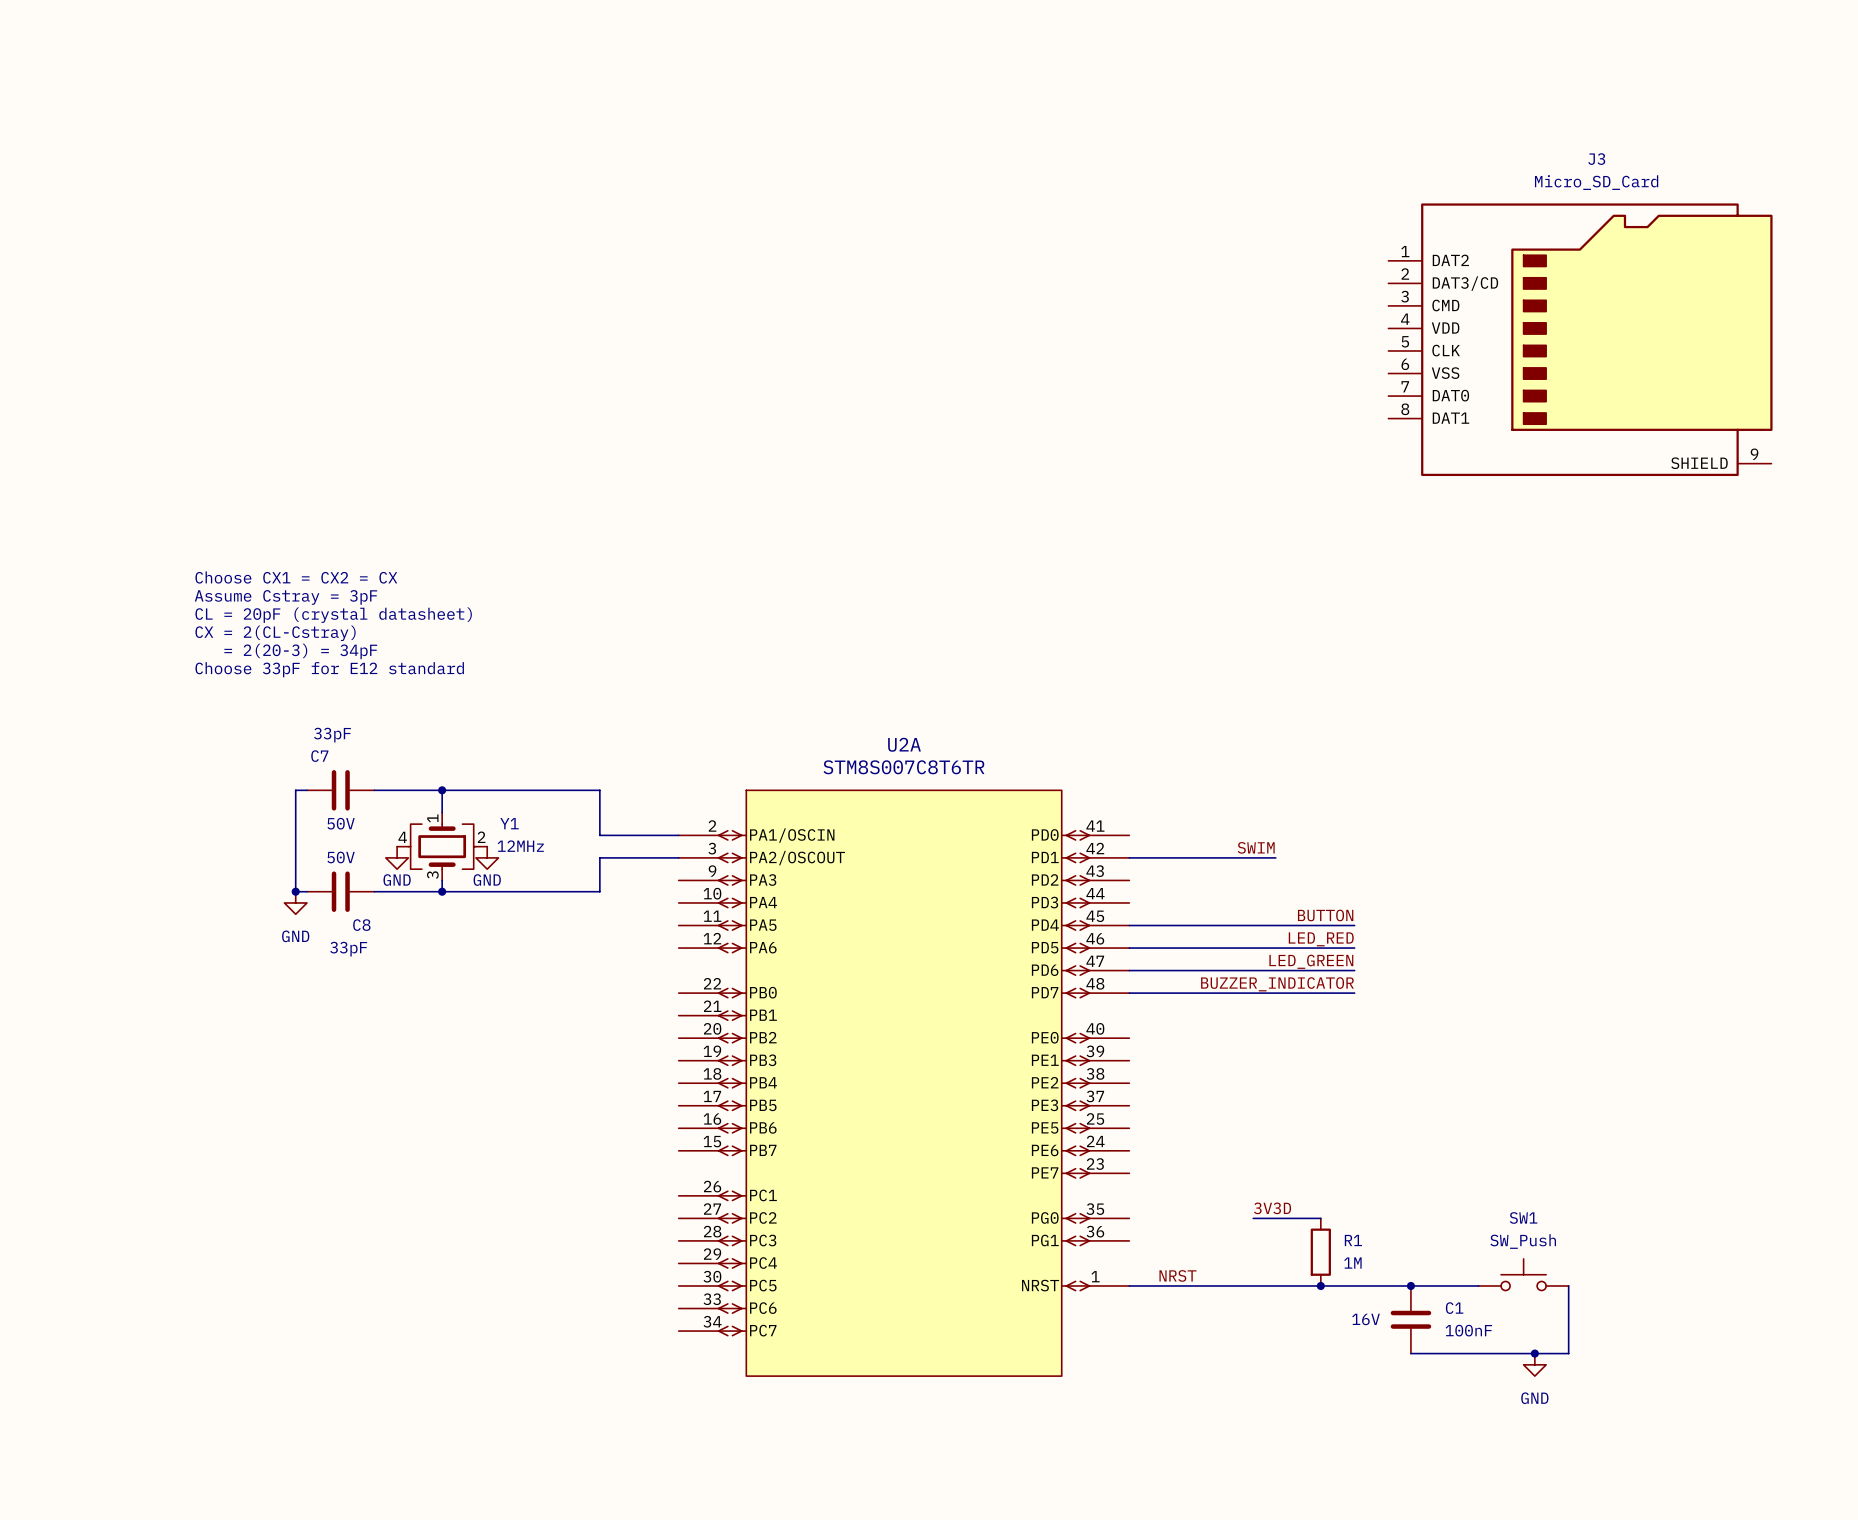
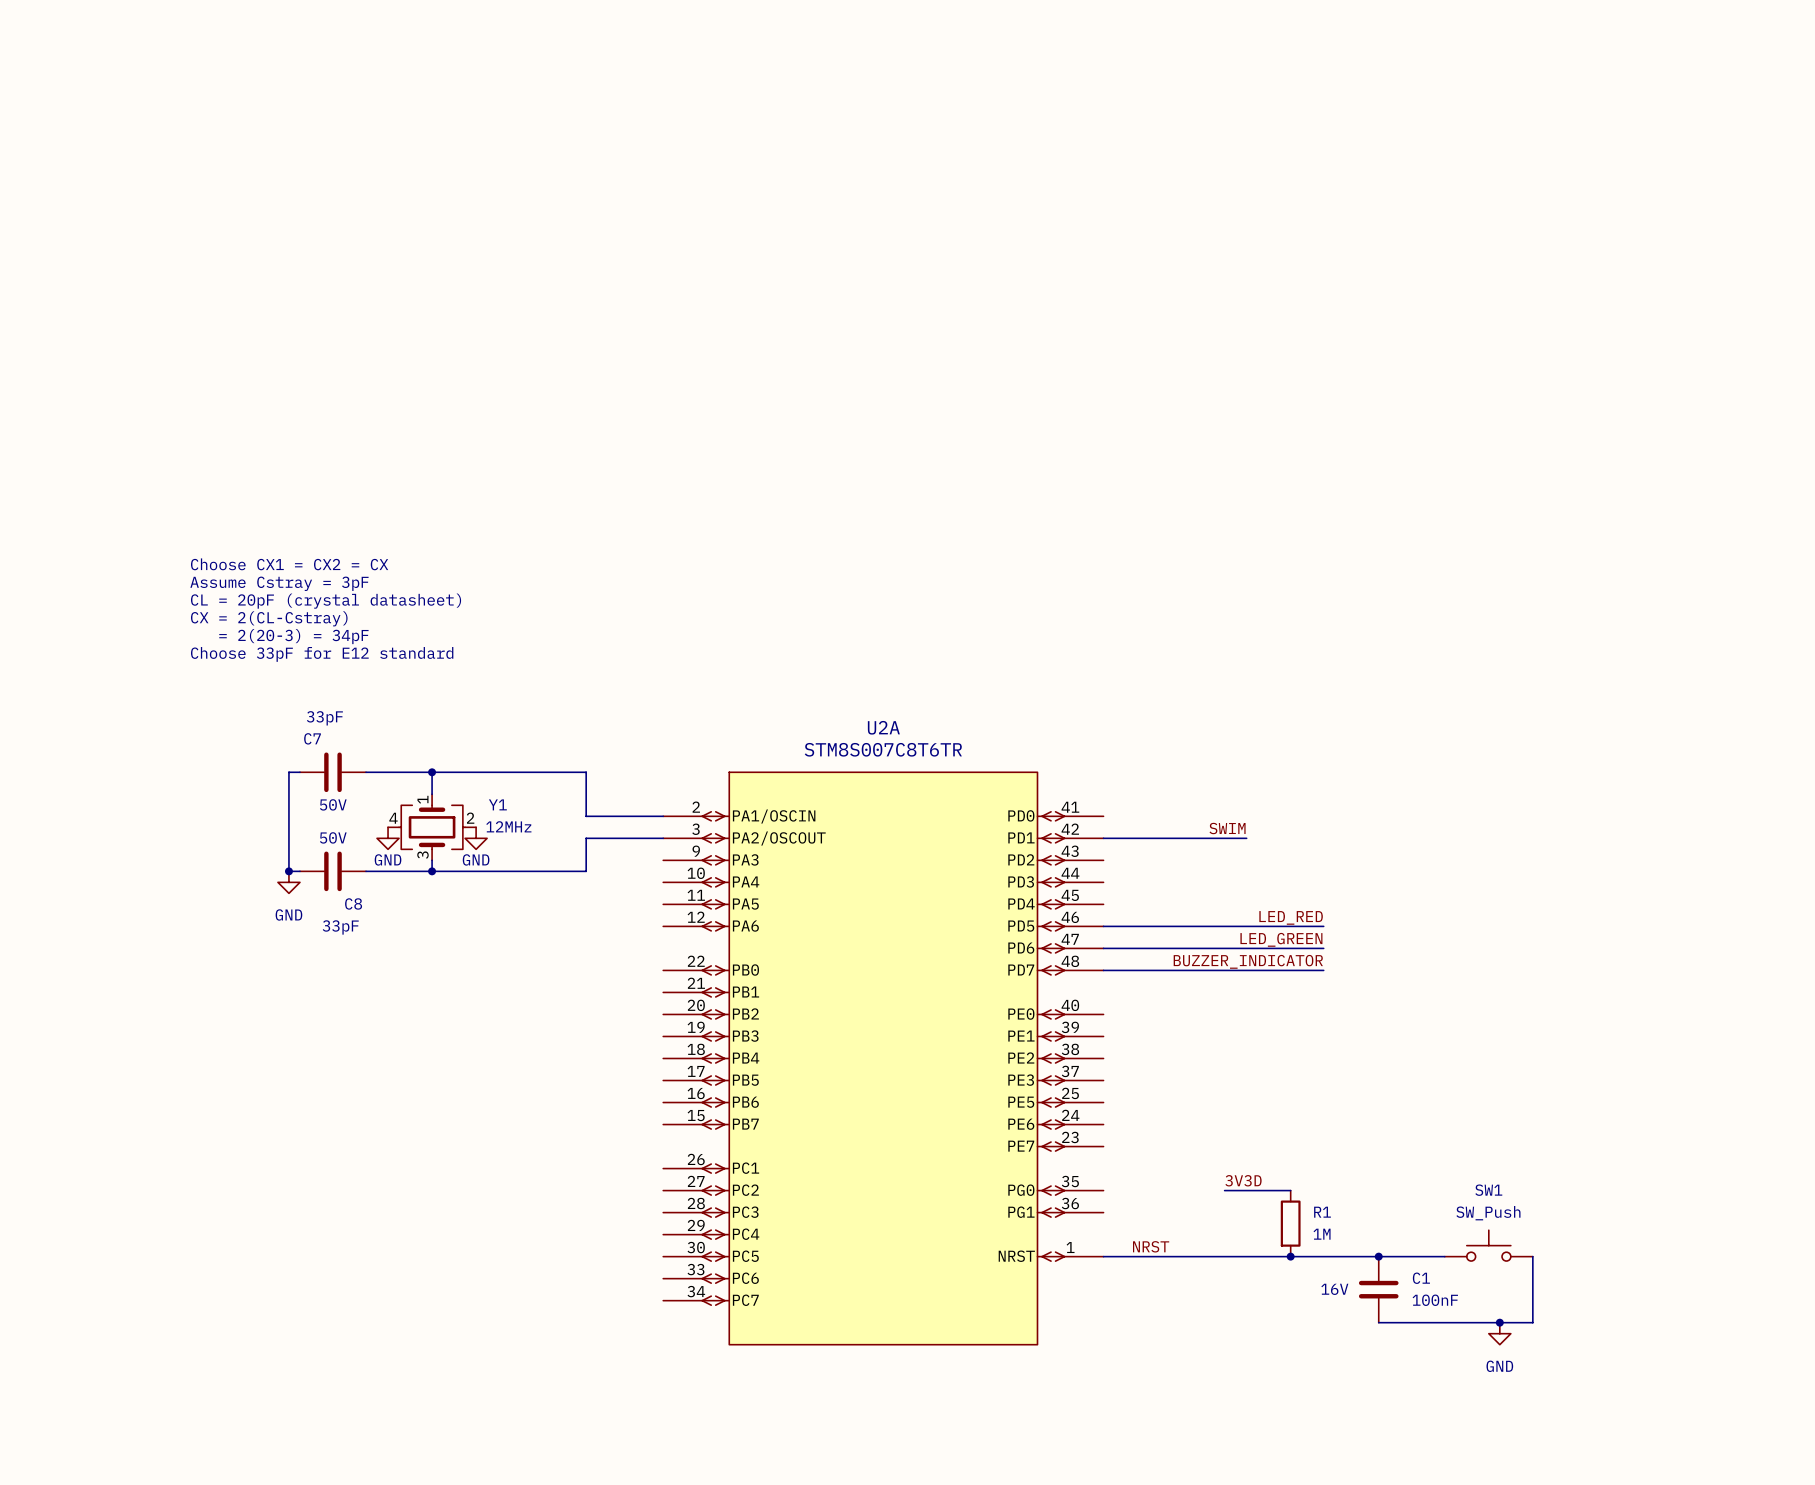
J3: Micro_SD_Card (1580, 339) -> none
label: BUTTON (1325, 915) -> none
wire: (1129, 925) (1354, 925) -> none

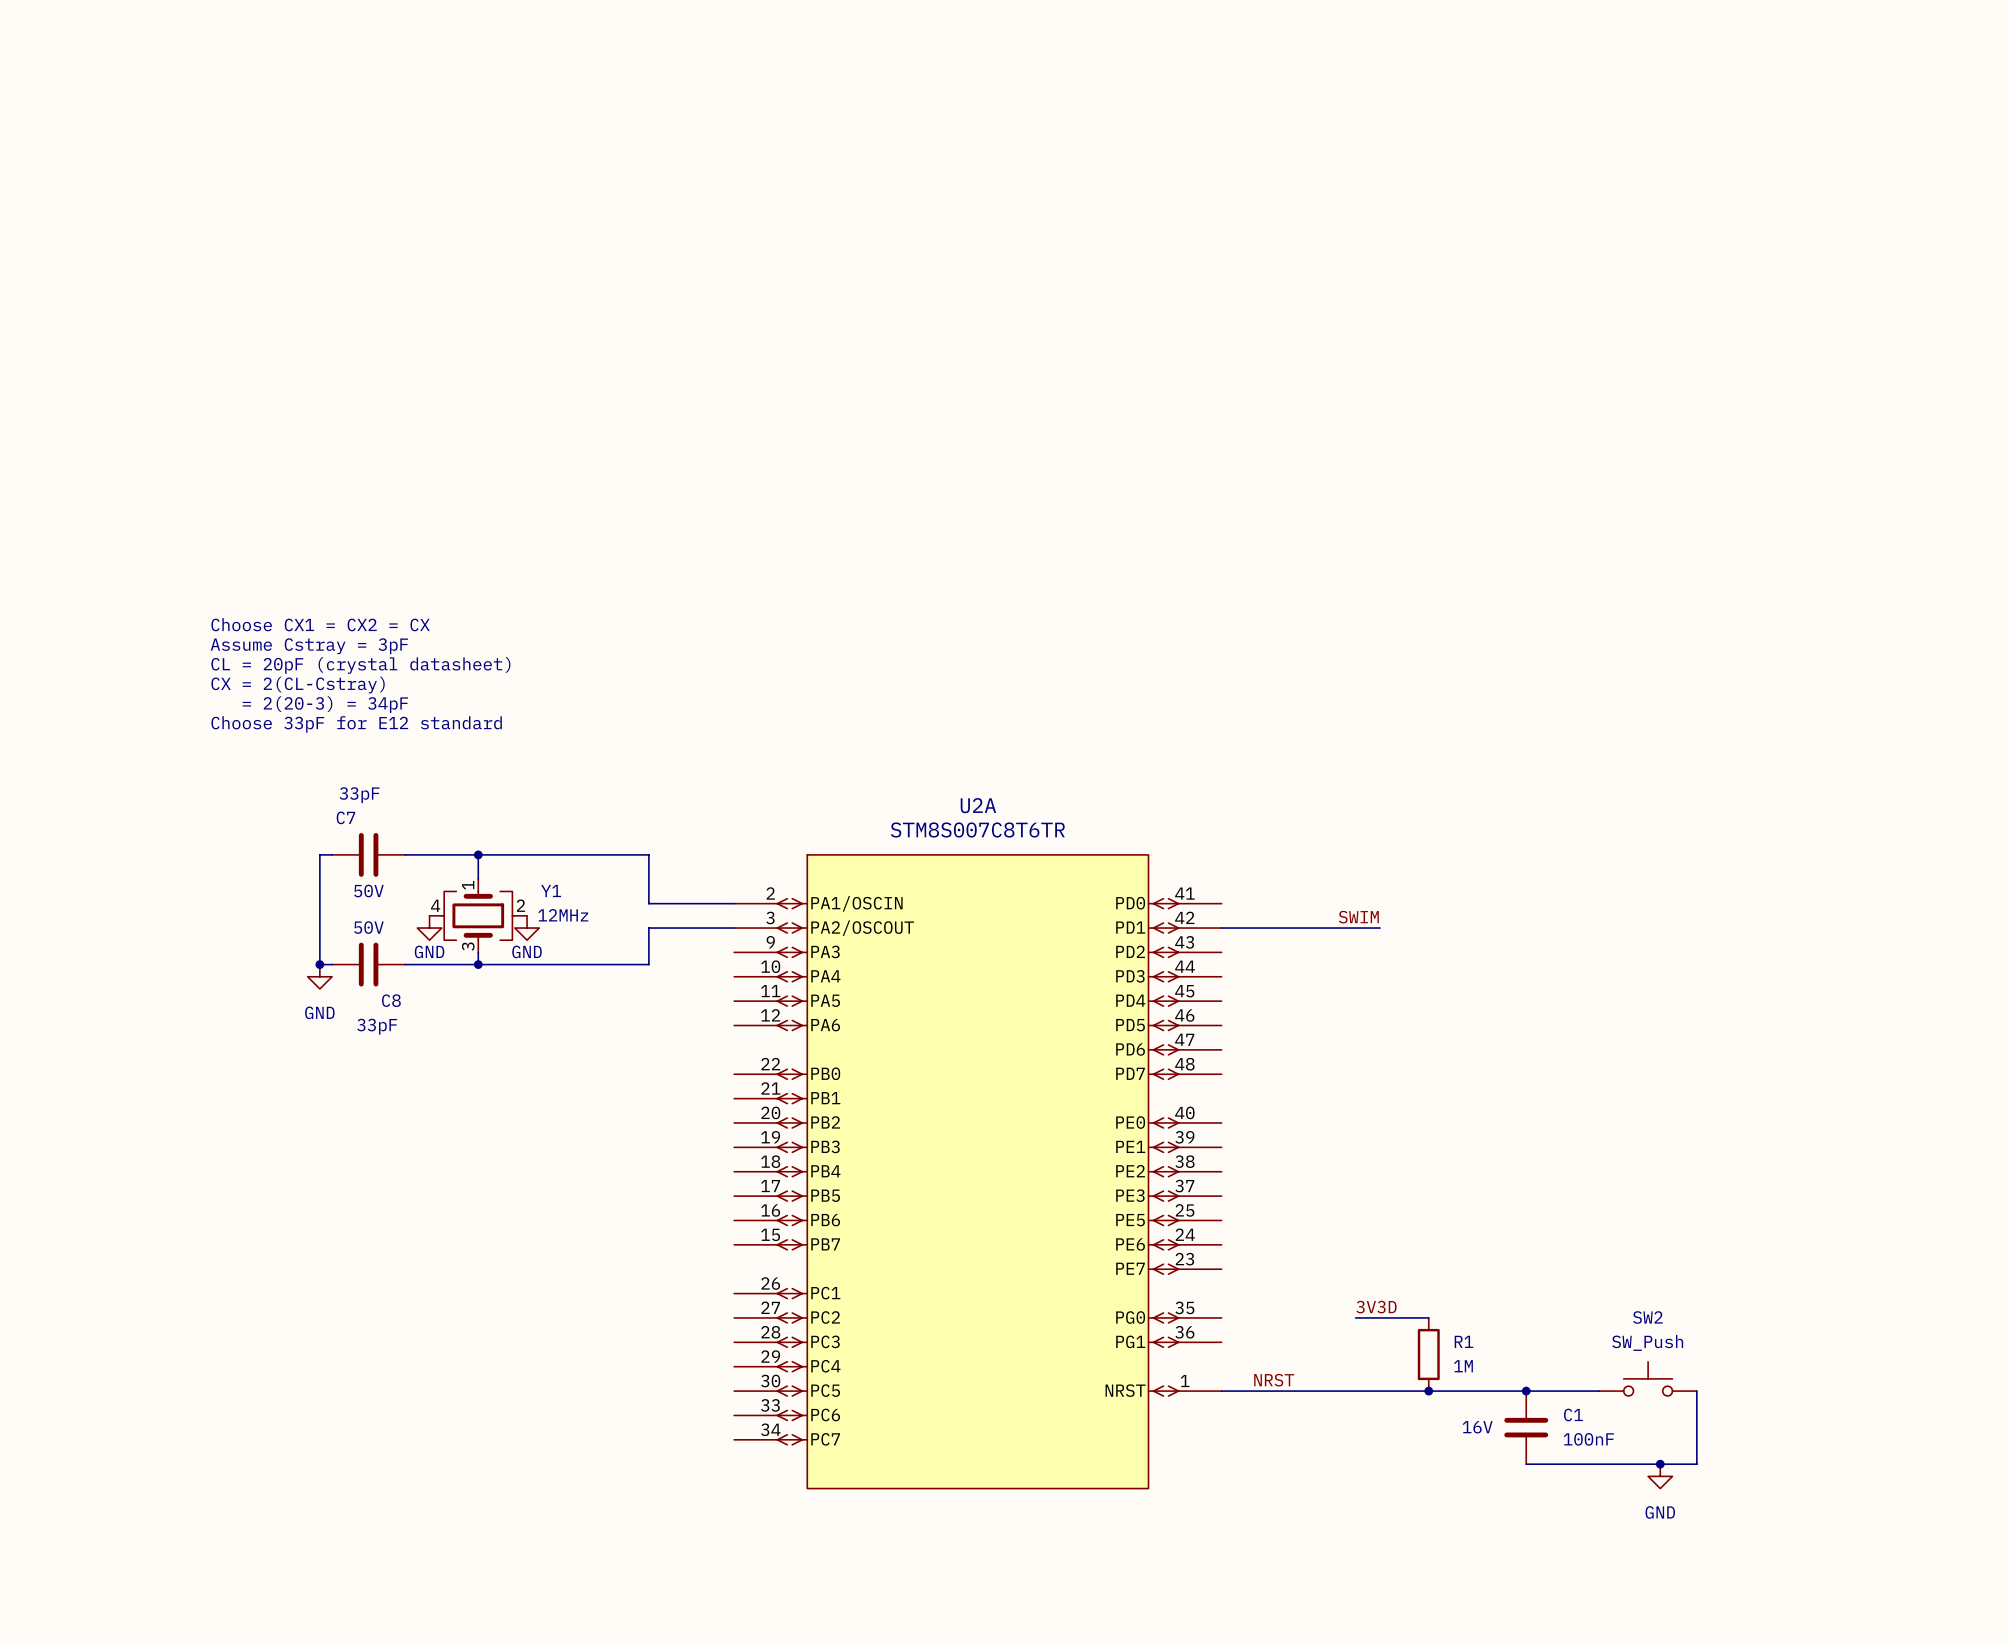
label: LED_RED (1291, 917) -> none
wire: (1103, 926) (1323, 926) -> none
label: LED_GREEN (1281, 939) -> none
wire: (1103, 948) (1323, 948) -> none
label: BUZZER_INDICATOR (1248, 961) -> none
wire: (1103, 970) (1323, 970) -> none
SW1 name: SW1 (1488, 1190) -> SW2 (1647, 1317)

